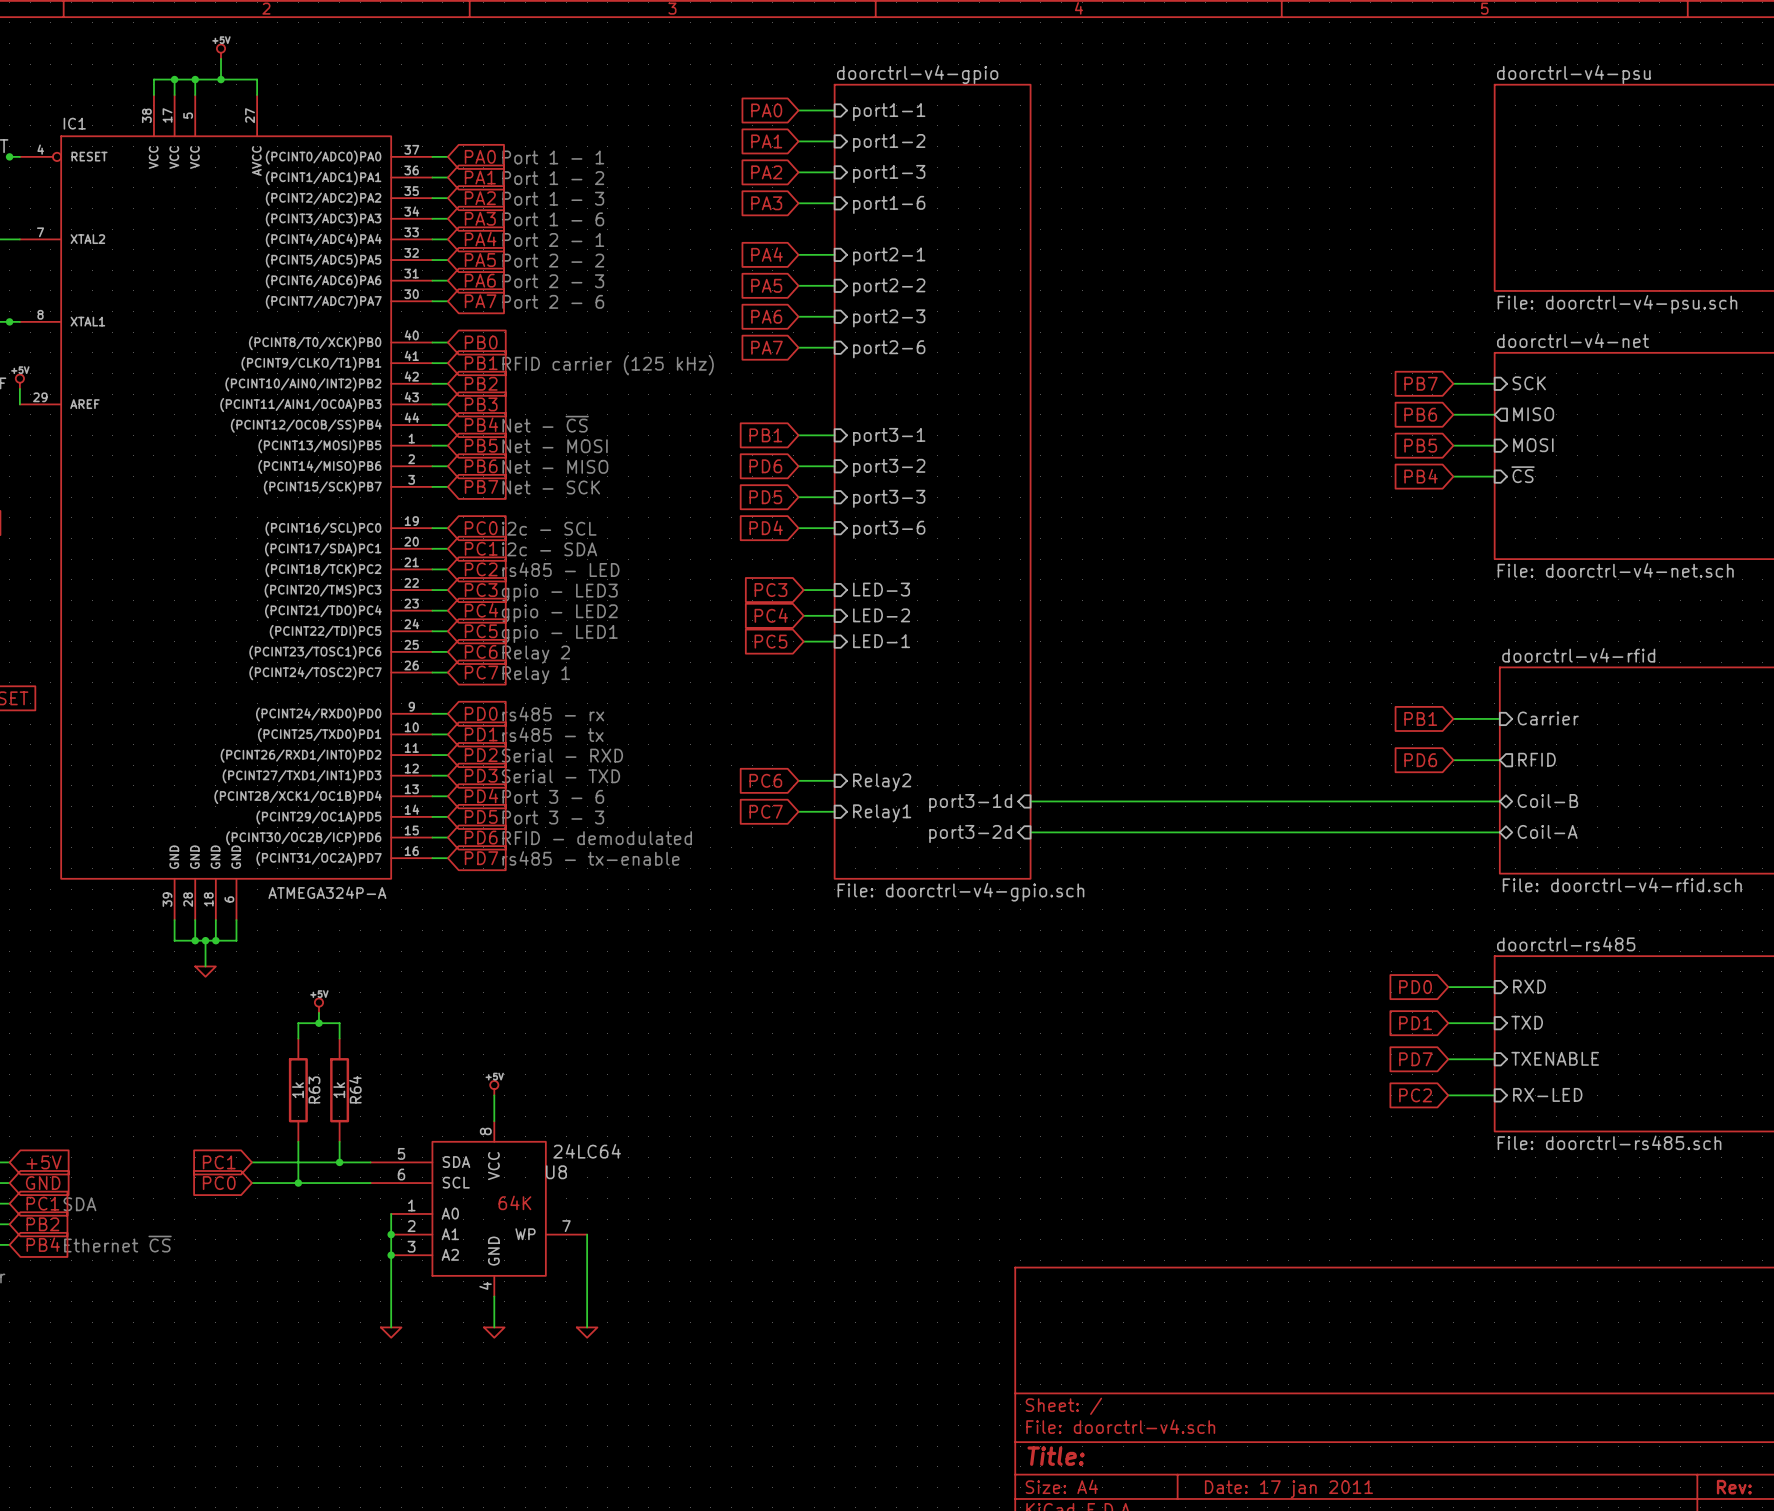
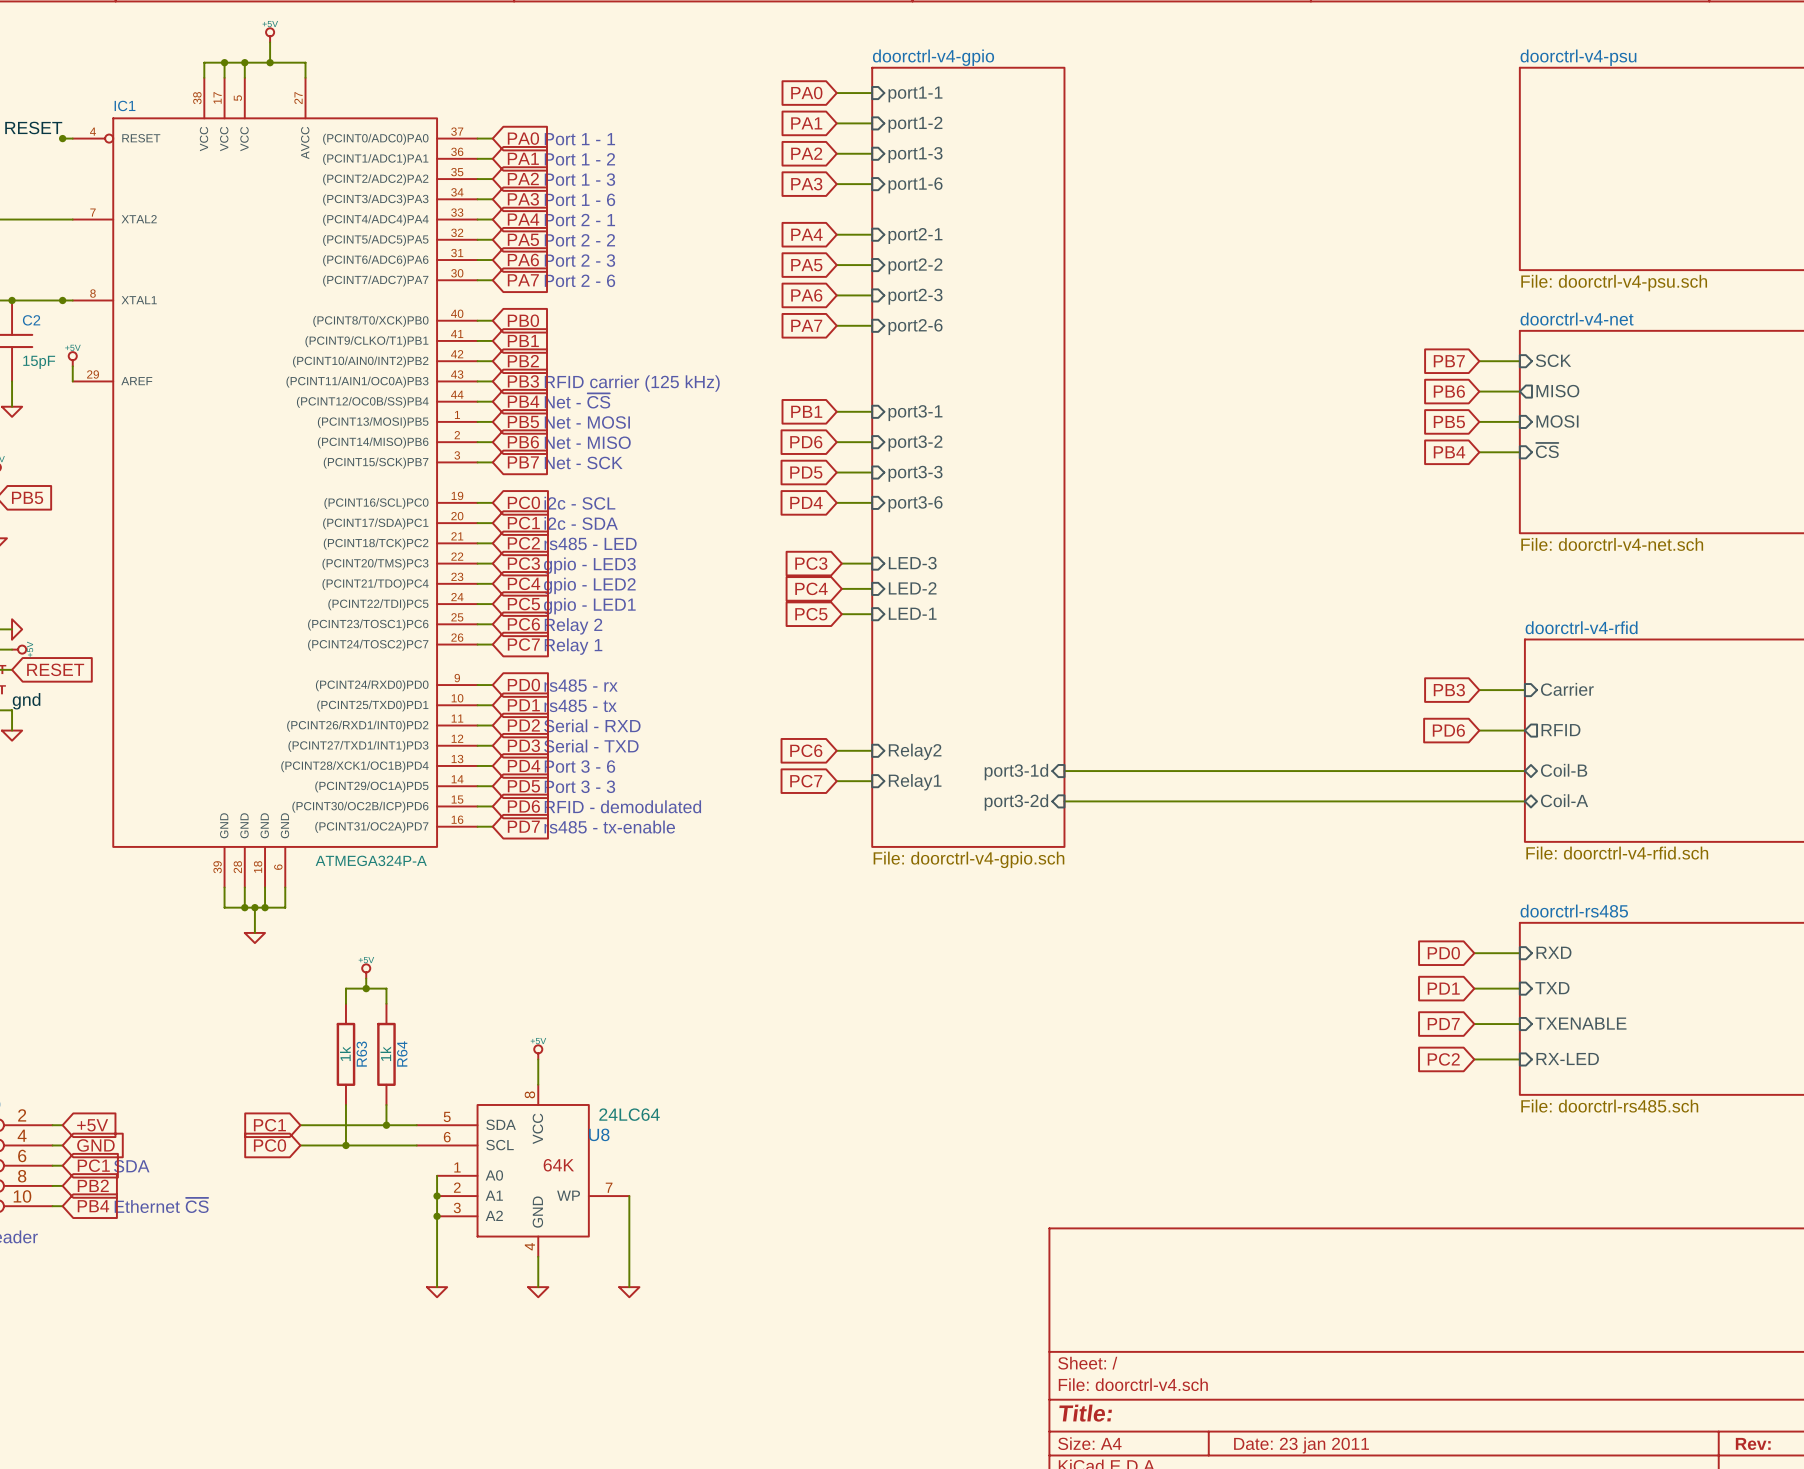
text position: RFID carrier (125 kHz) (608, 365) -> RFID carrier (125 kHz) (632, 383)
global label: PB1 (1420, 718) -> PB3 (1449, 690)
title block: Date: 17 jan 2011 (1288, 1489) -> Date: 23 jan 2011 (1301, 1445)

